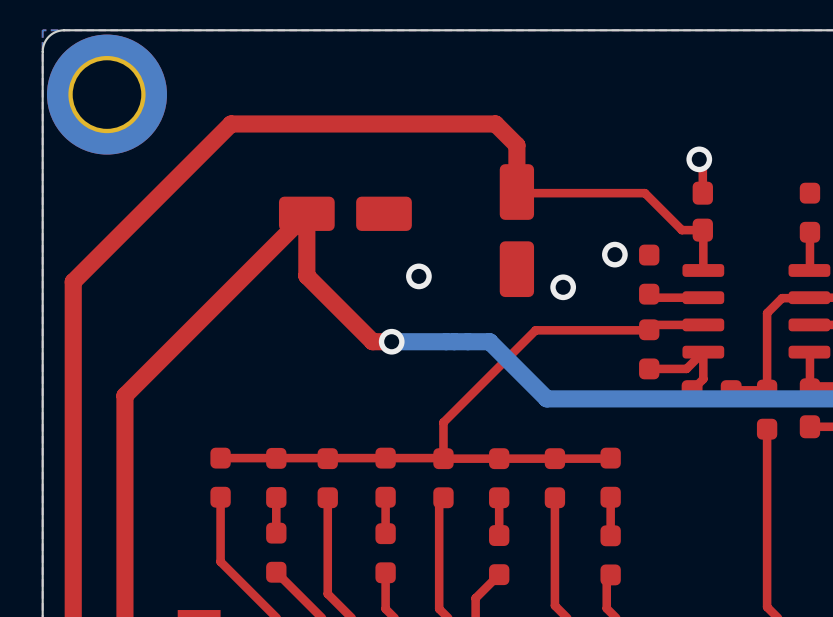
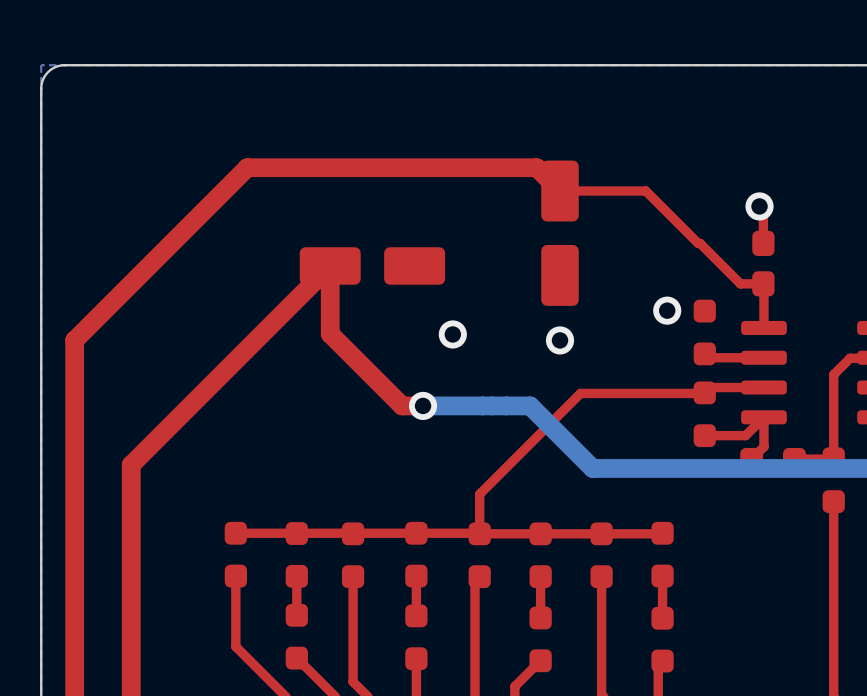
part: (106, 94) -> none
top track: (516, 145) (518, 193) (643, 193) -> (560, 191) (645, 191) (698, 243)
part position: (516, 230) -> (560, 233)
via position: (563, 287) -> (560, 340)

